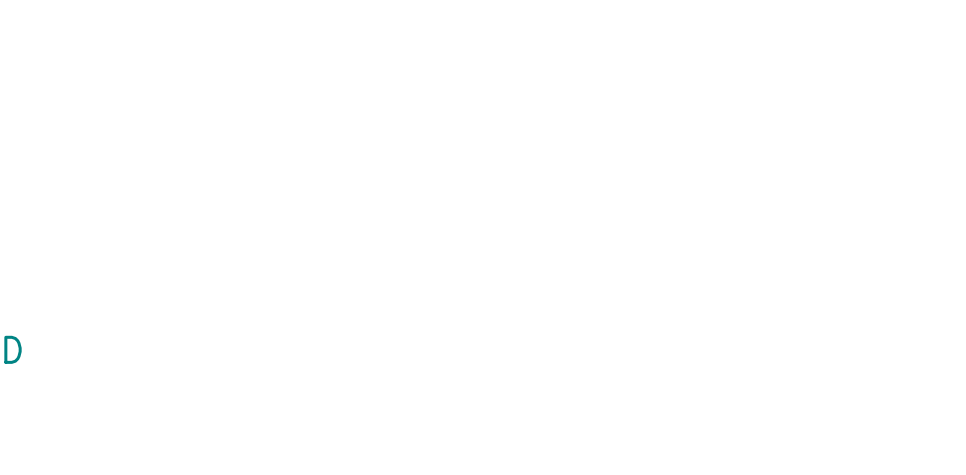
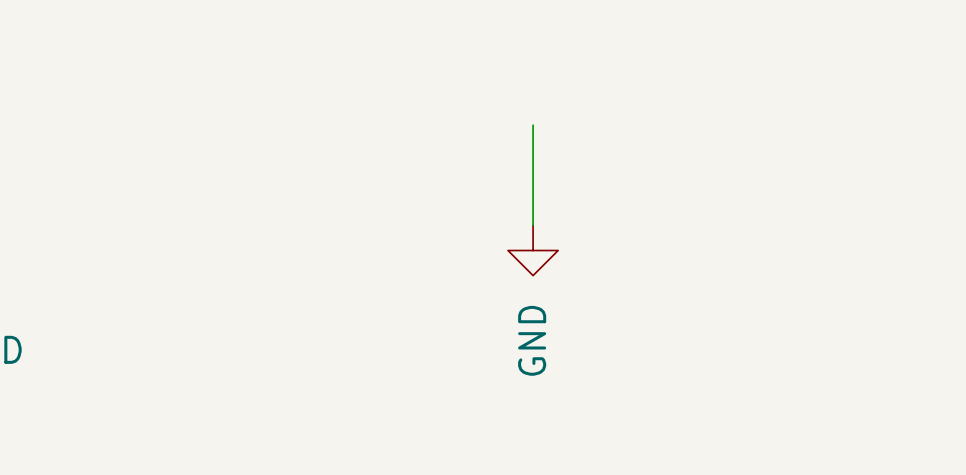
wire: none -> (533, 125) (533, 225)
power symbol: none -> GND (533, 250)

